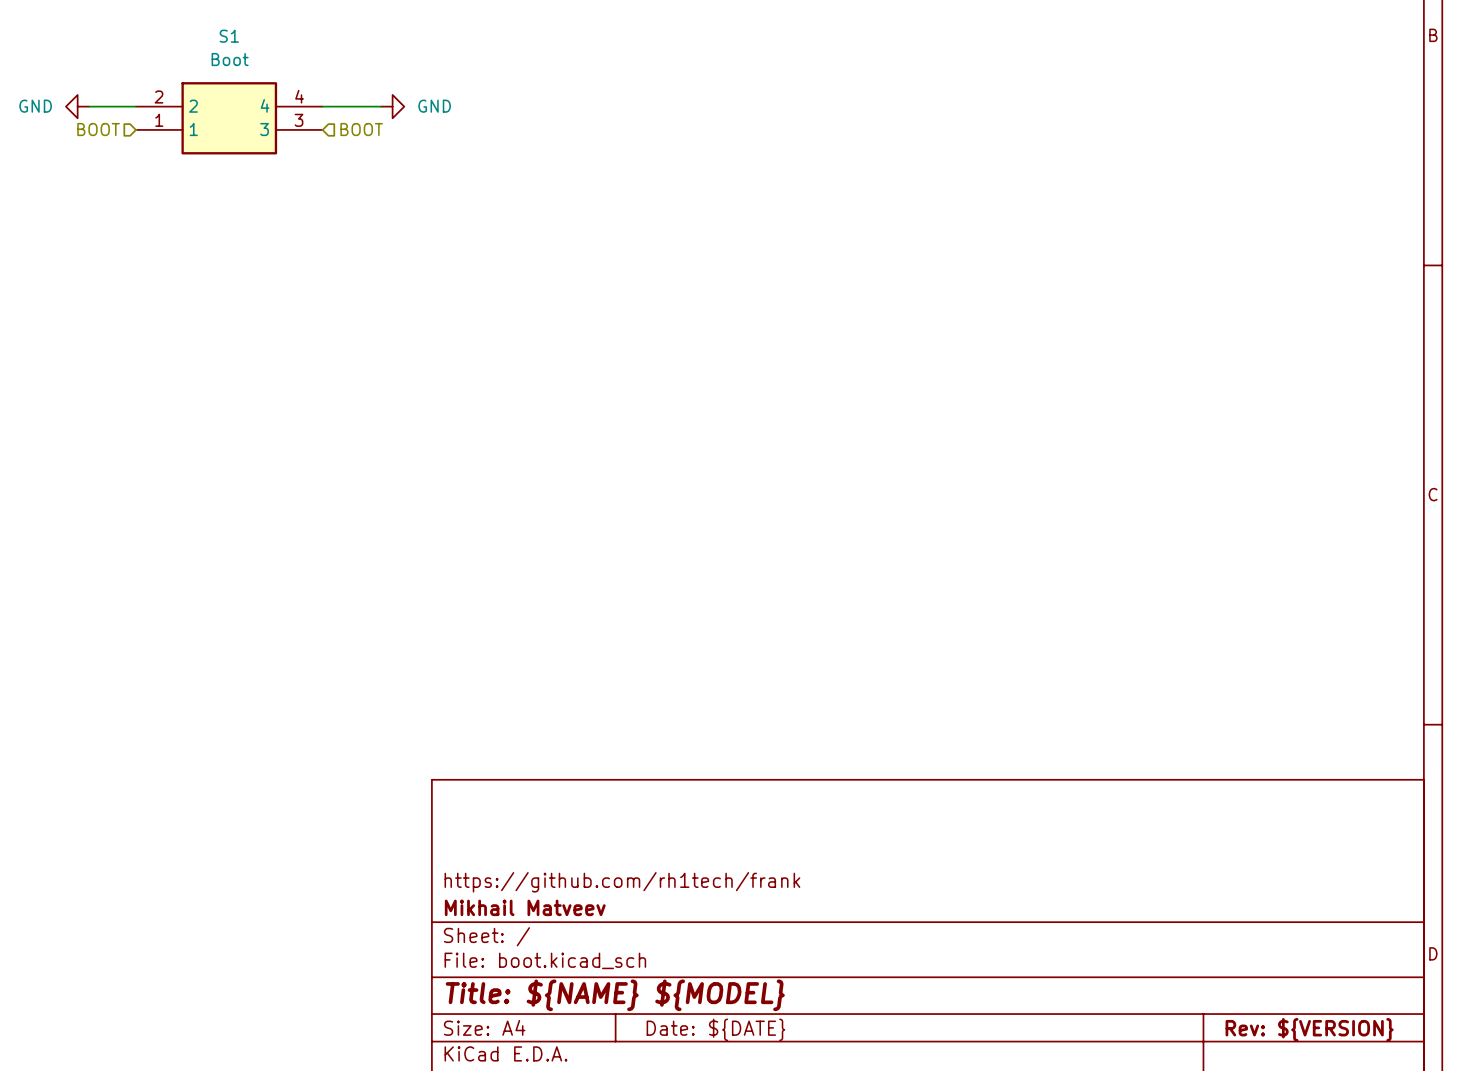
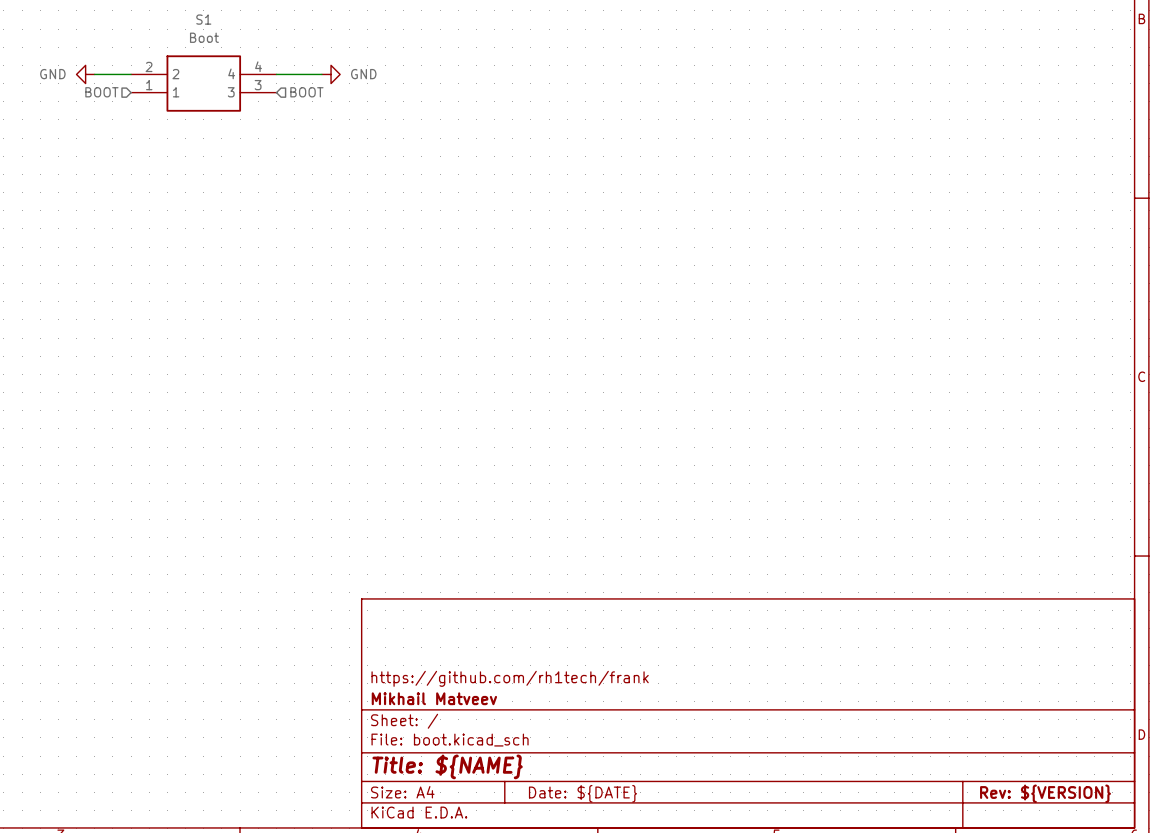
title block: Title: ${NAME} ${MODEL} (615, 995) -> Title: ${NAME} (447, 766)

